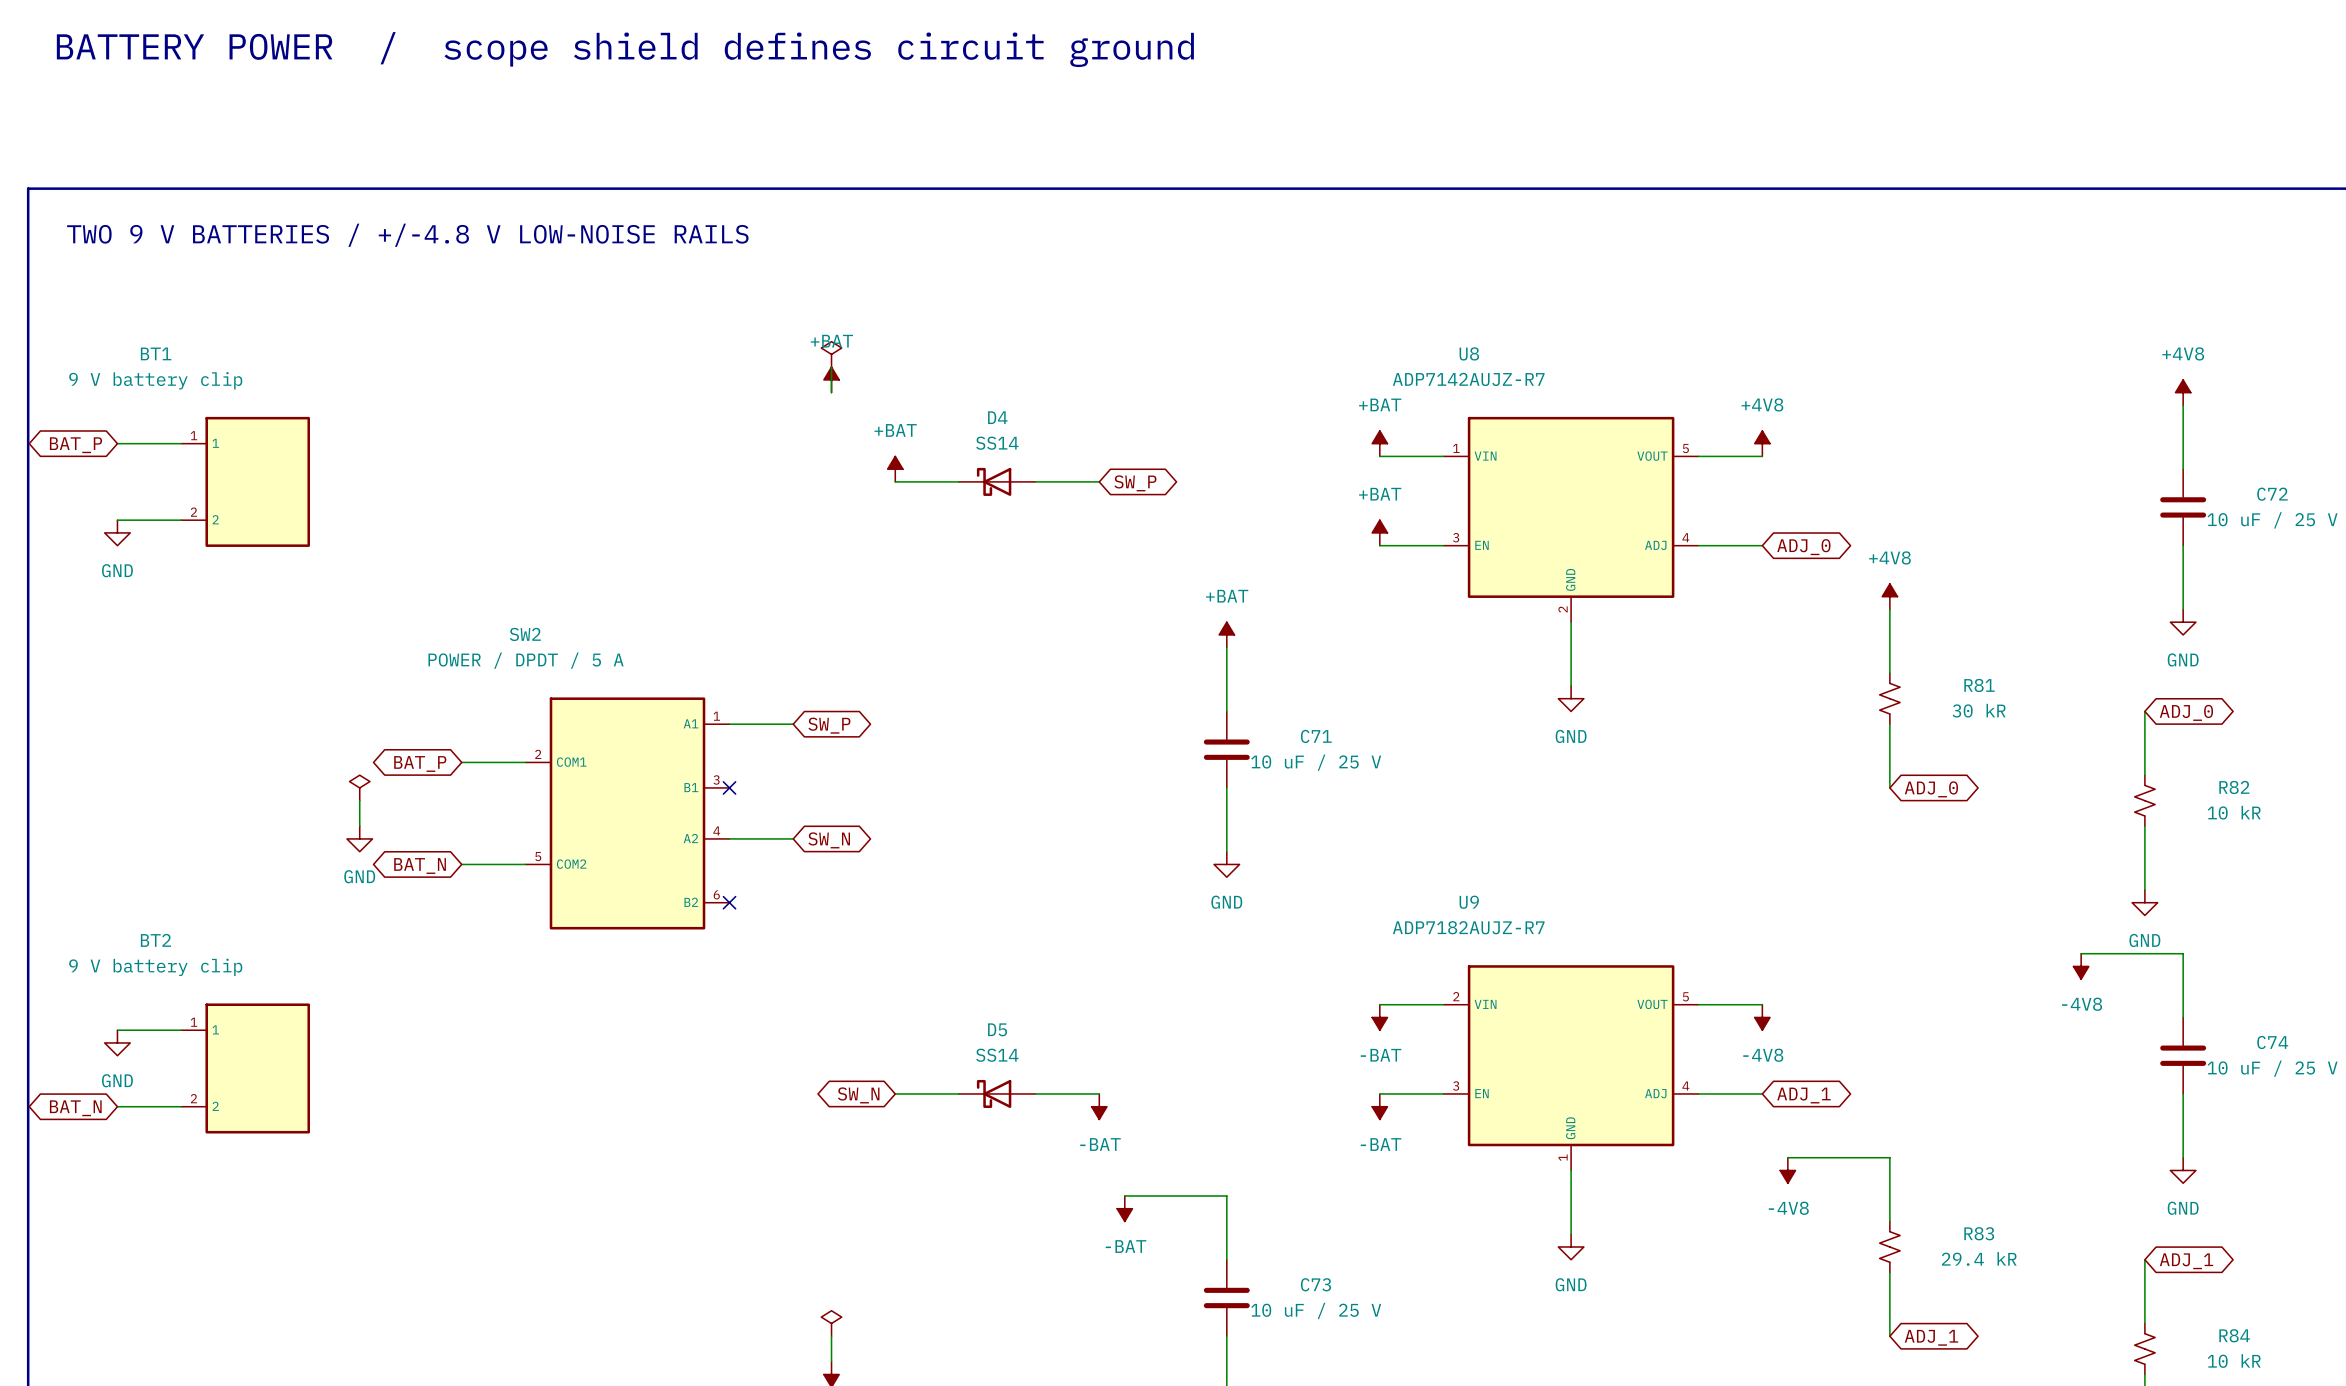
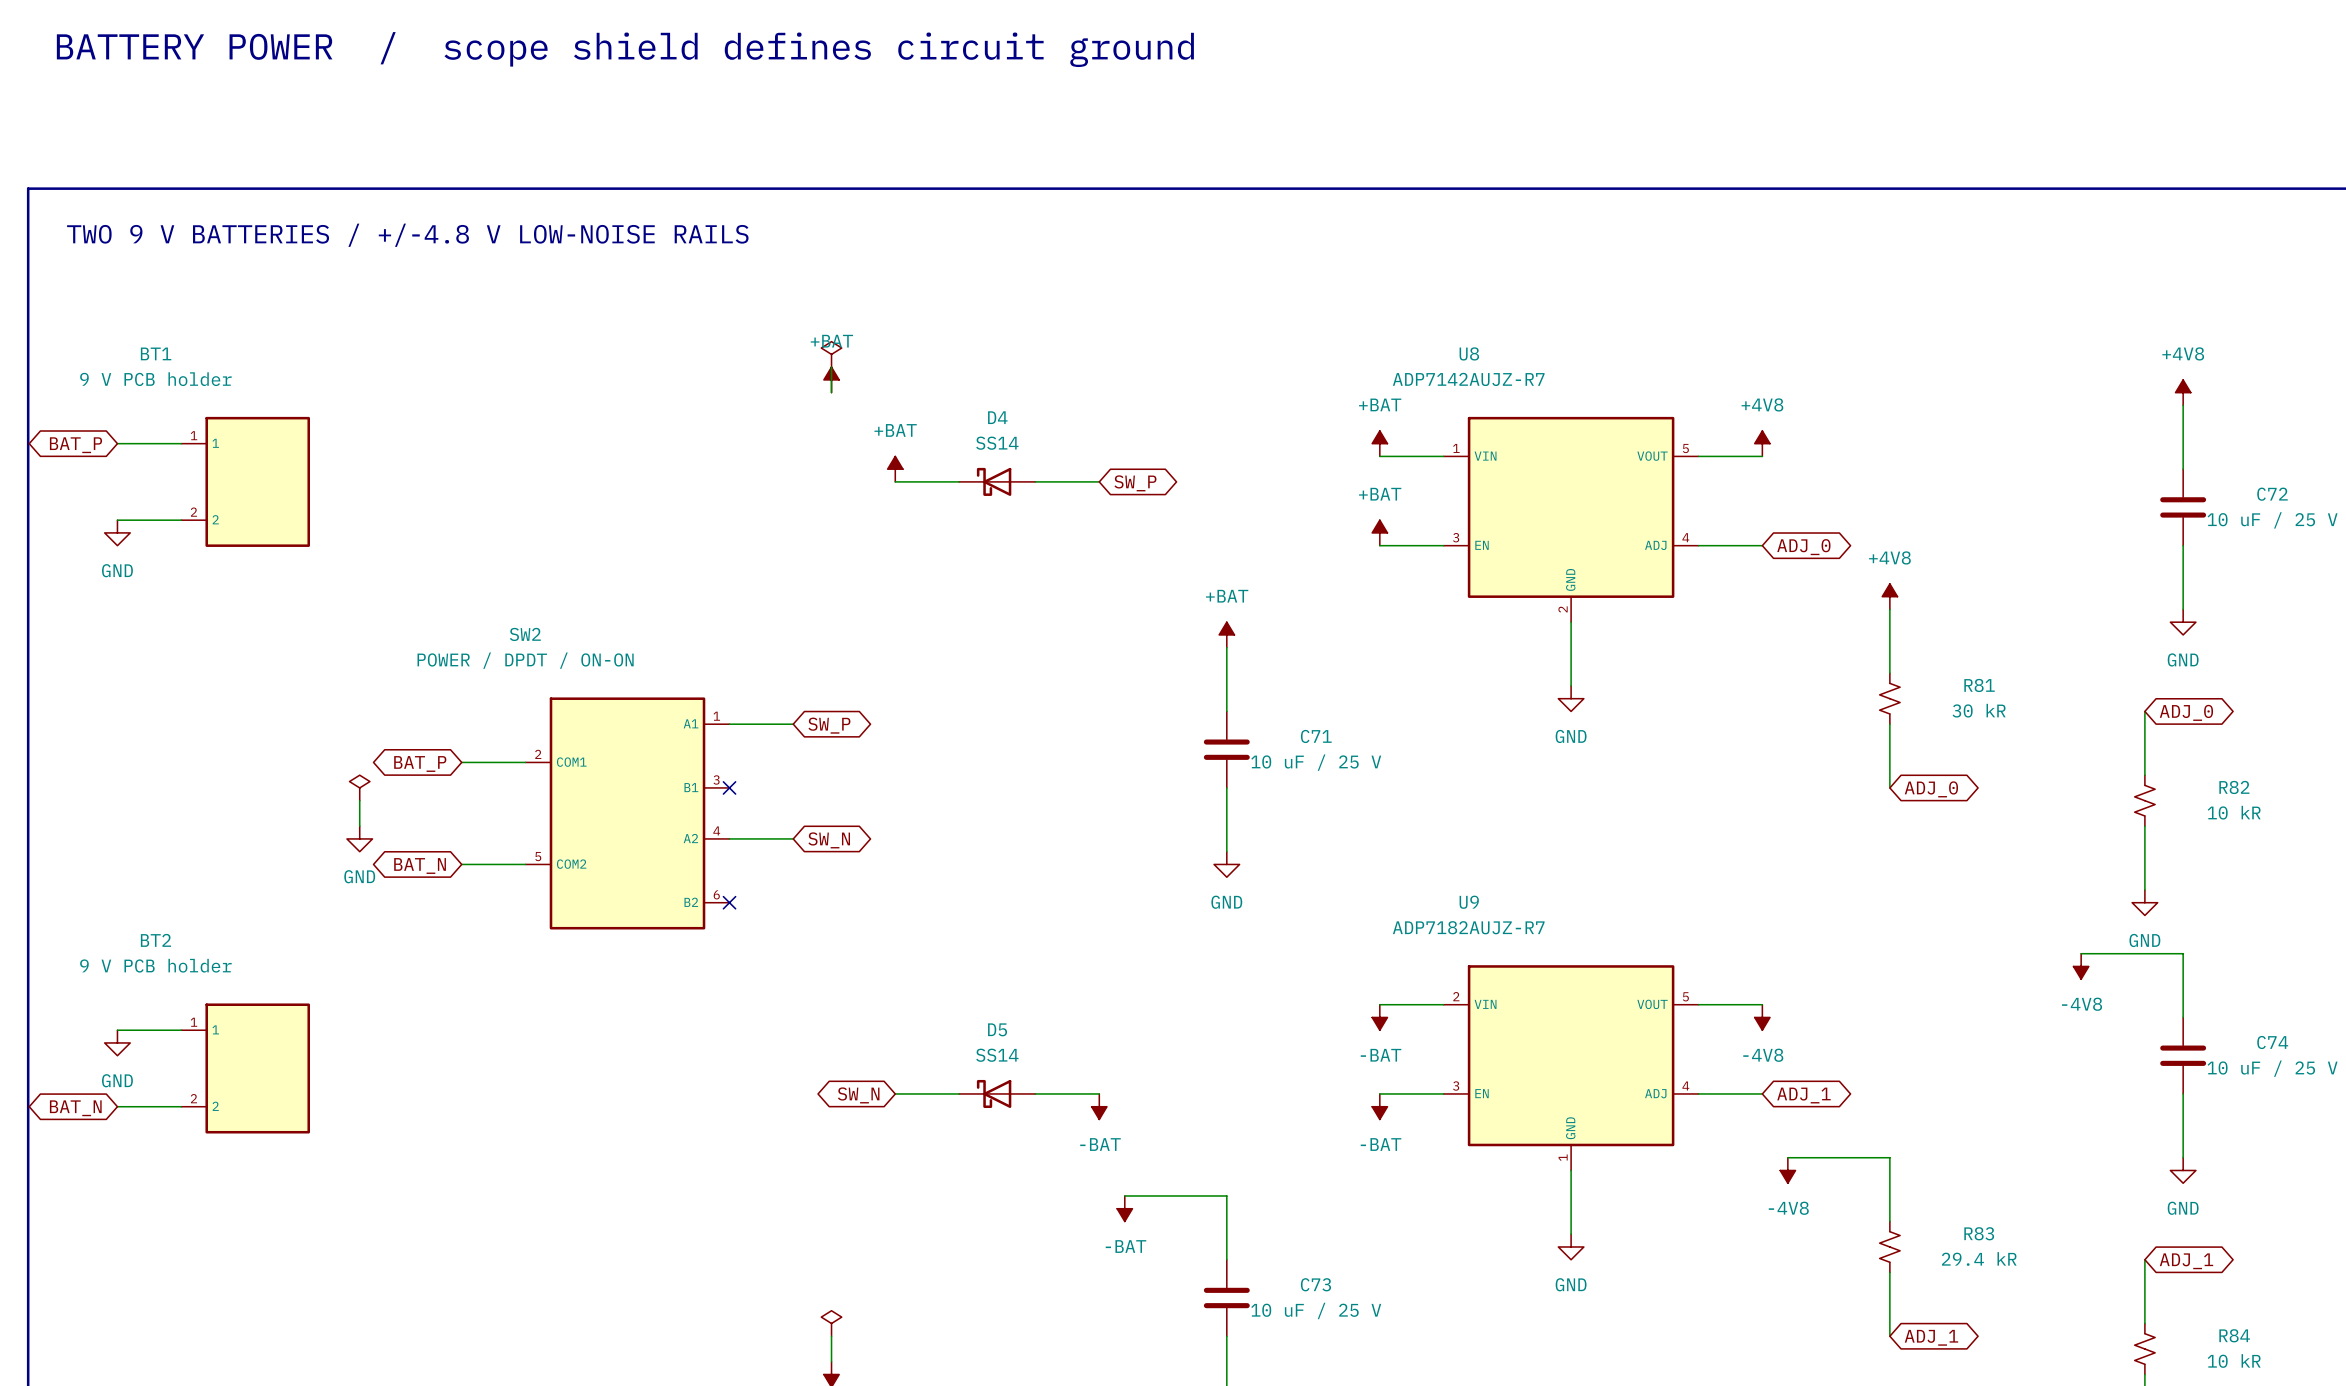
BT1 value: 9 V battery clip (155, 380) -> 9 V PCB holder (155, 379)
SW2 value: POWER / DPDT / 5 A (526, 660) -> POWER / DPDT / ON-ON (525, 660)
BT2 value: 9 V battery clip (155, 967) -> 9 V PCB holder (155, 965)

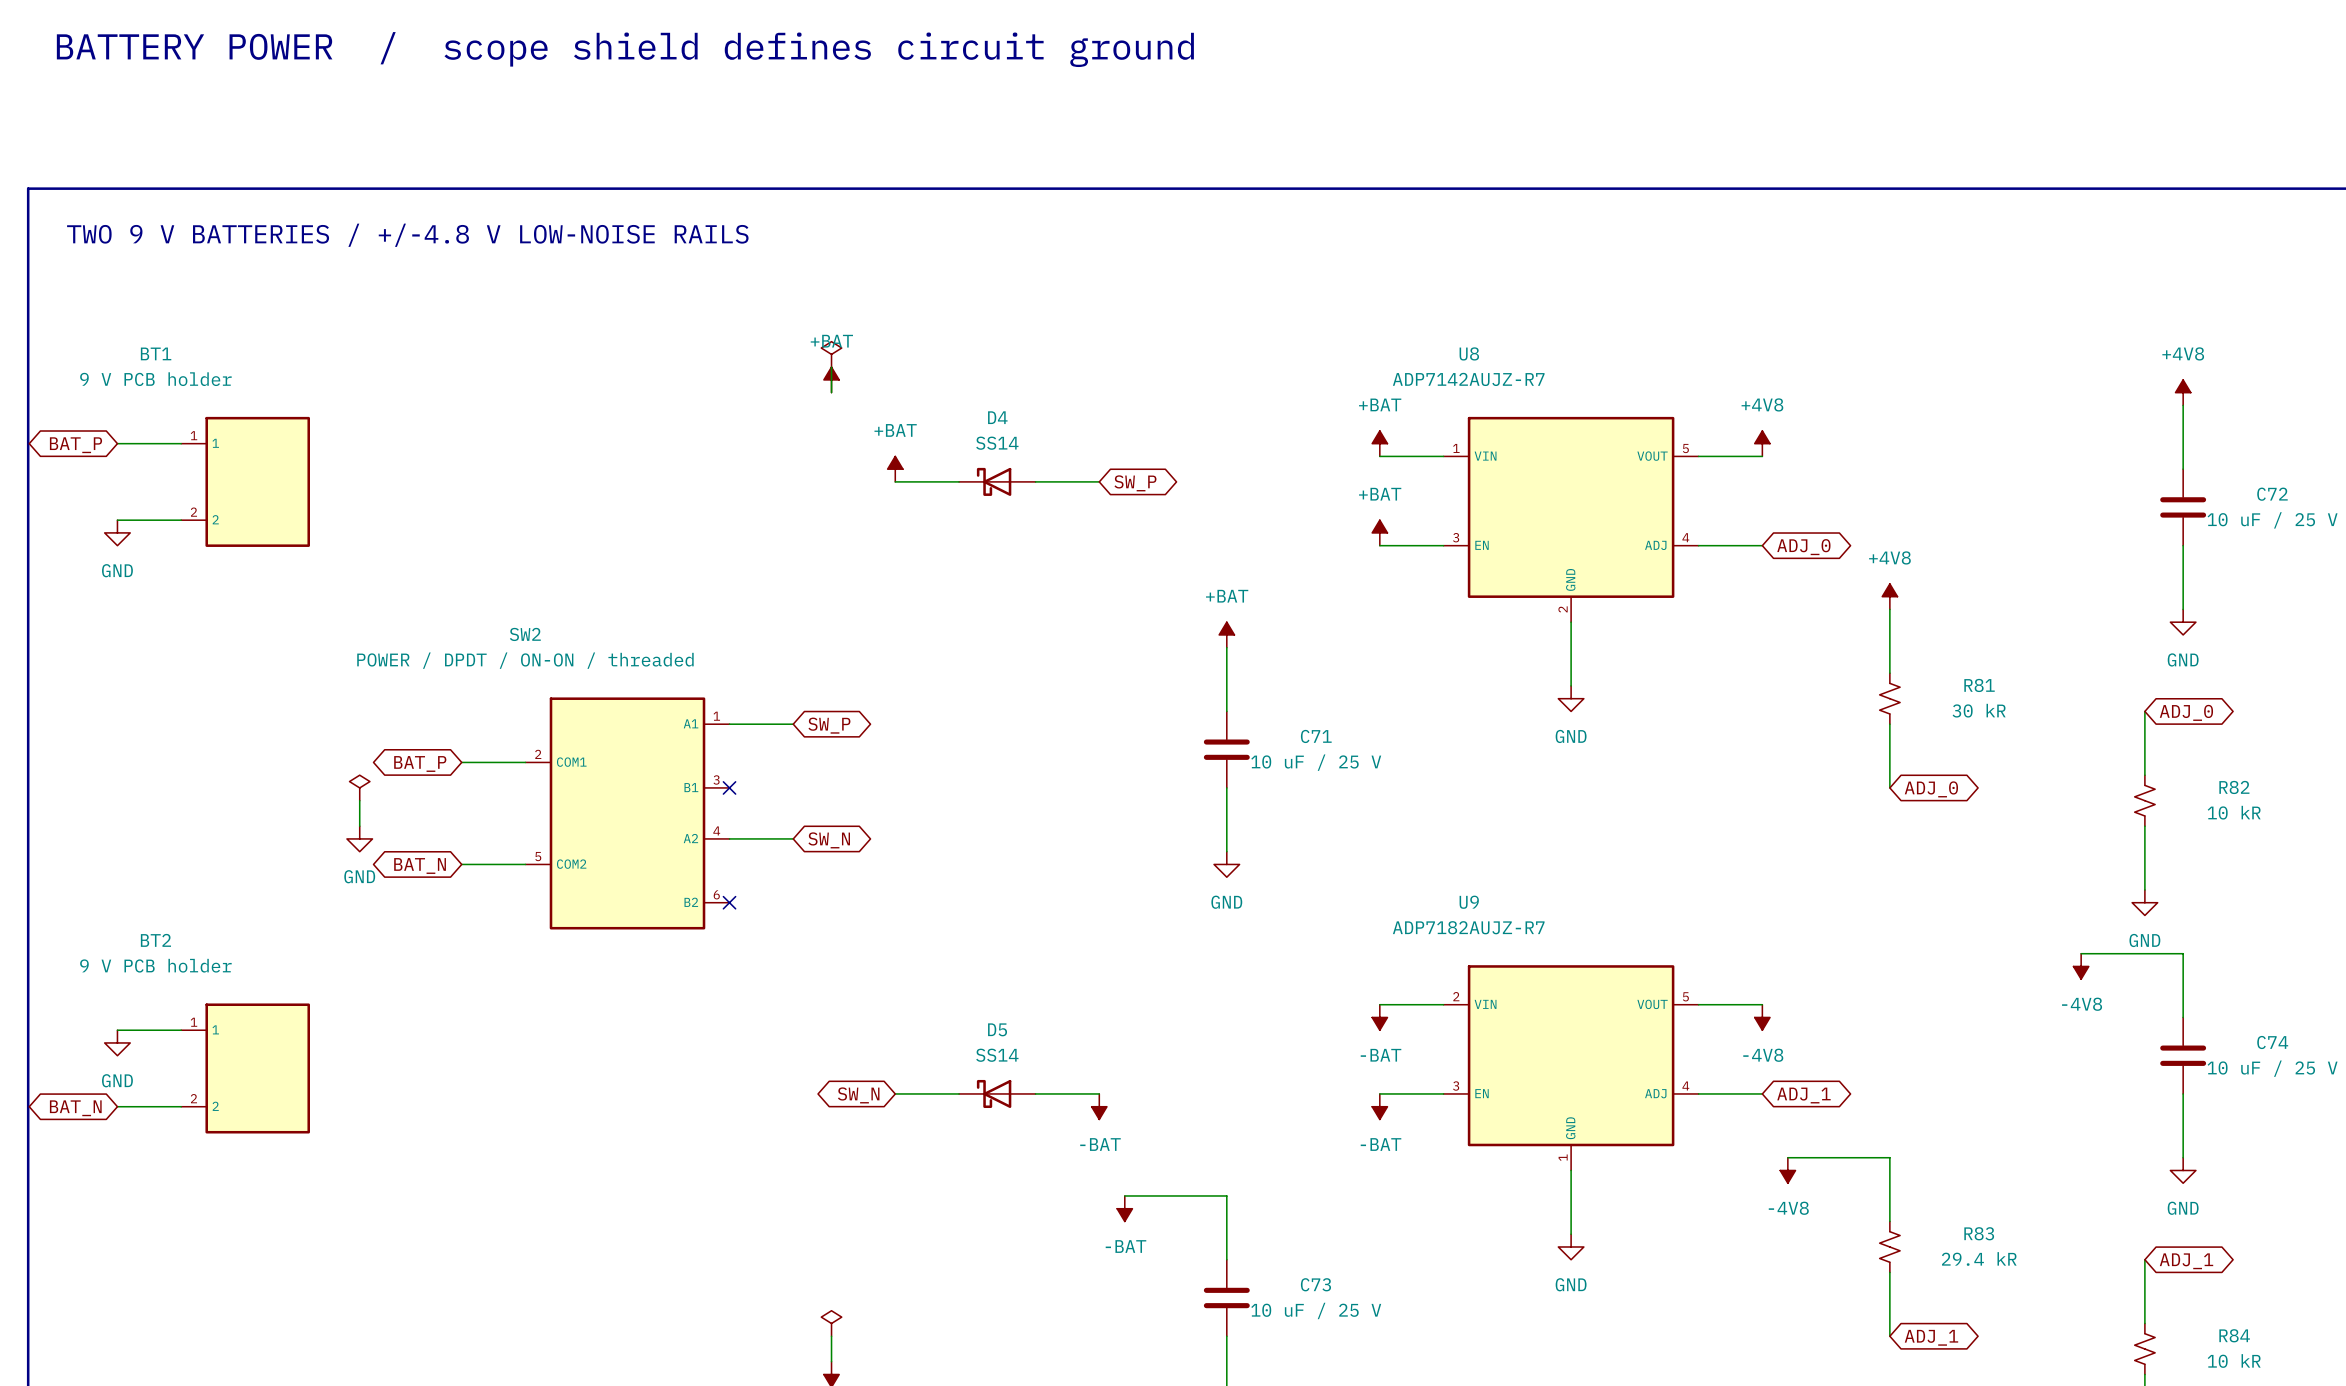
SW2 value: POWER / DPDT / ON-ON (525, 660) -> POWER / DPDT / ON-ON / threaded (525, 660)

